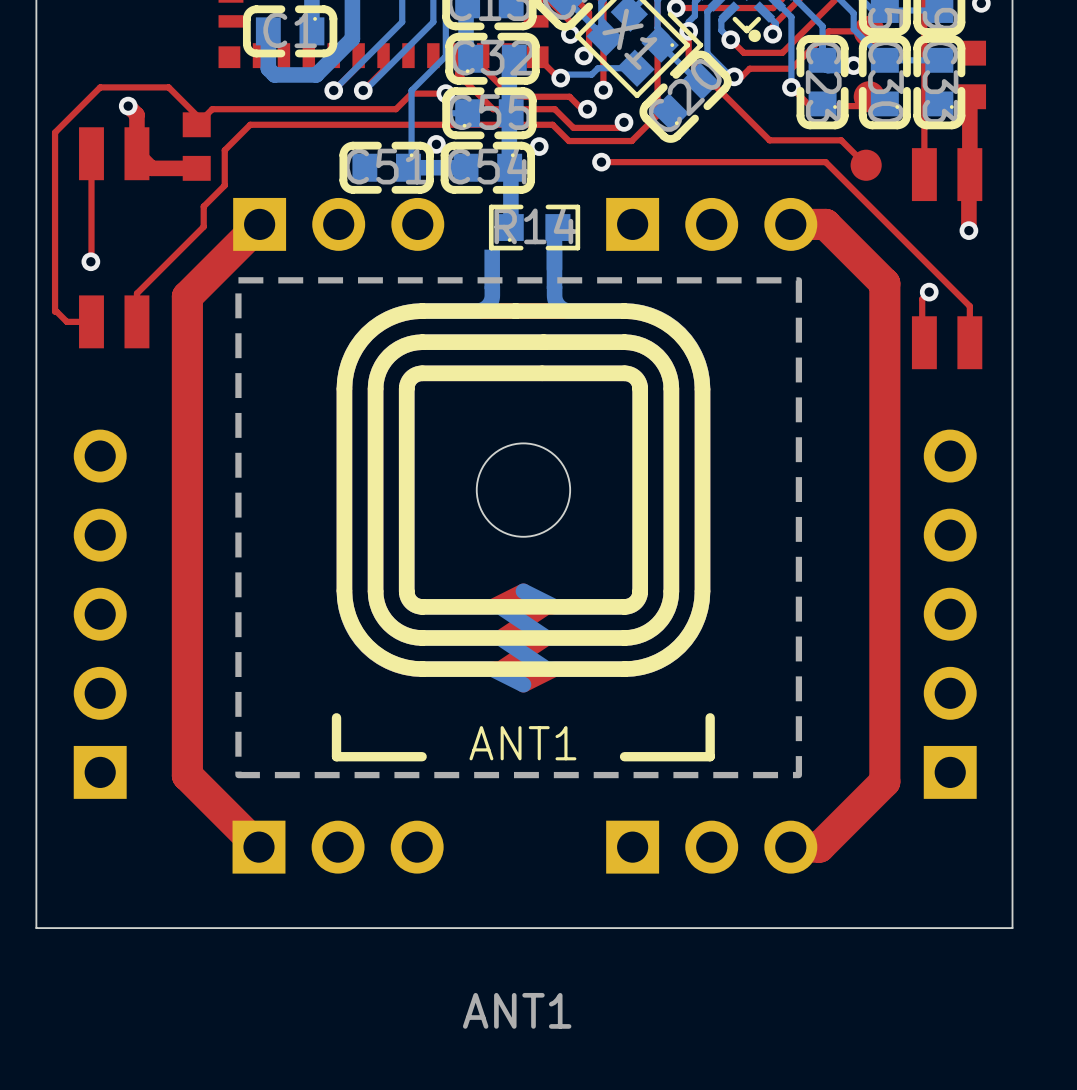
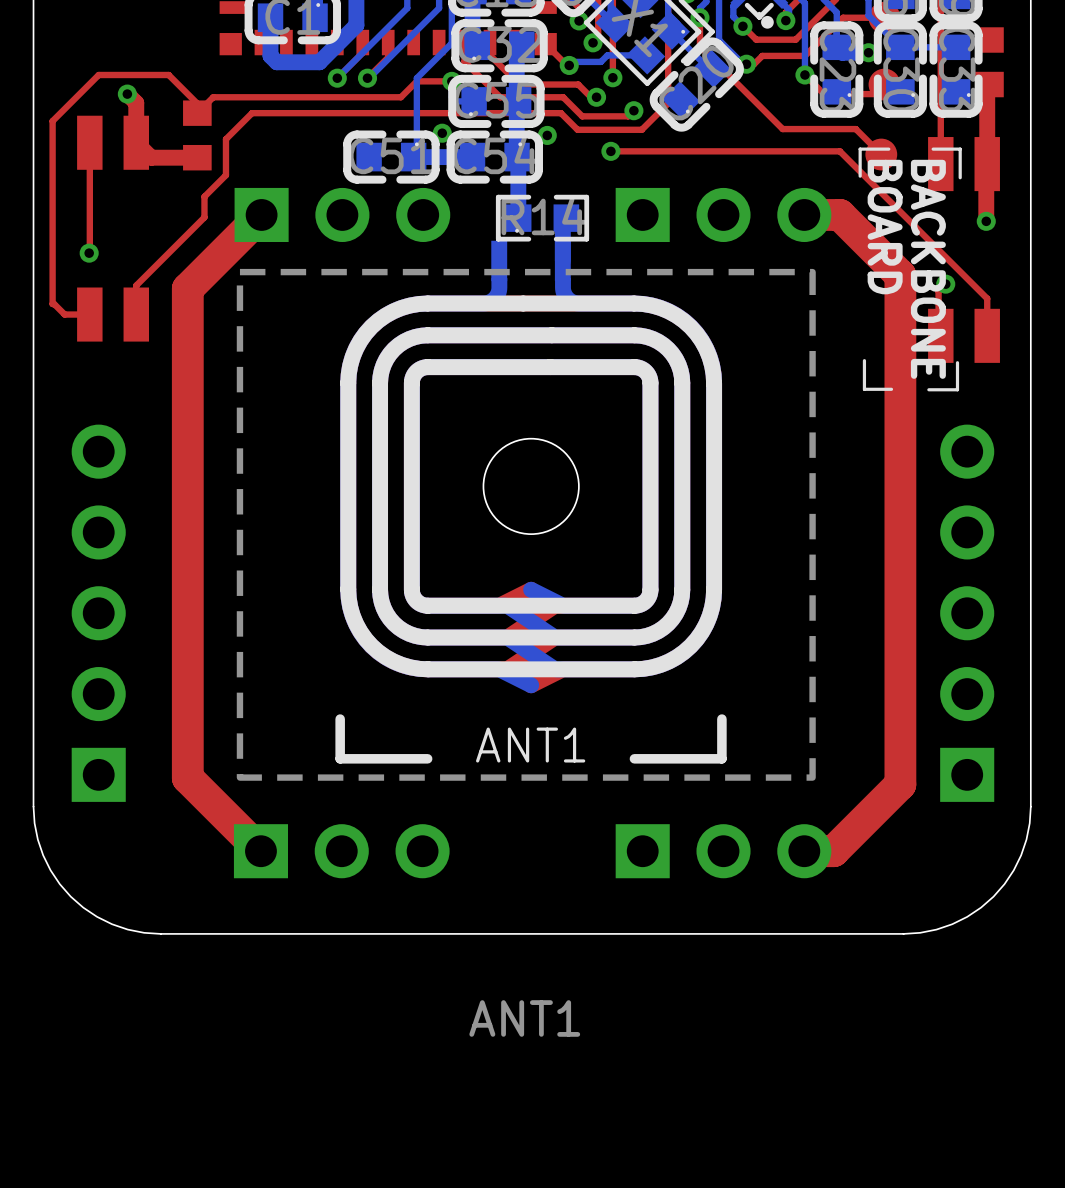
line: none -> (888, 149) (860, 149) (860, 176)
line: none -> (933, 149) (960, 149) (960, 177)
text: none -> BOARD (885, 227)
text: none -> BACKBONE (928, 269)
line: none -> (864, 360) (864, 389) (891, 389)
line: none -> (957, 362) (957, 389) (928, 389)
board edge: (36, 803) (36, 928) (160, 928) -> (33, 806) (37, 839) (43, 855) (59, 884) (70, 896) (83, 907) (112, 924) (144, 932) (160, 933)
board edge: (1012, 803) (1012, 928) (887, 928) -> (1030, 806) (1029, 823) (1021, 855) (1013, 870) (993, 896) (967, 916) (952, 924) (936, 929) (903, 933)

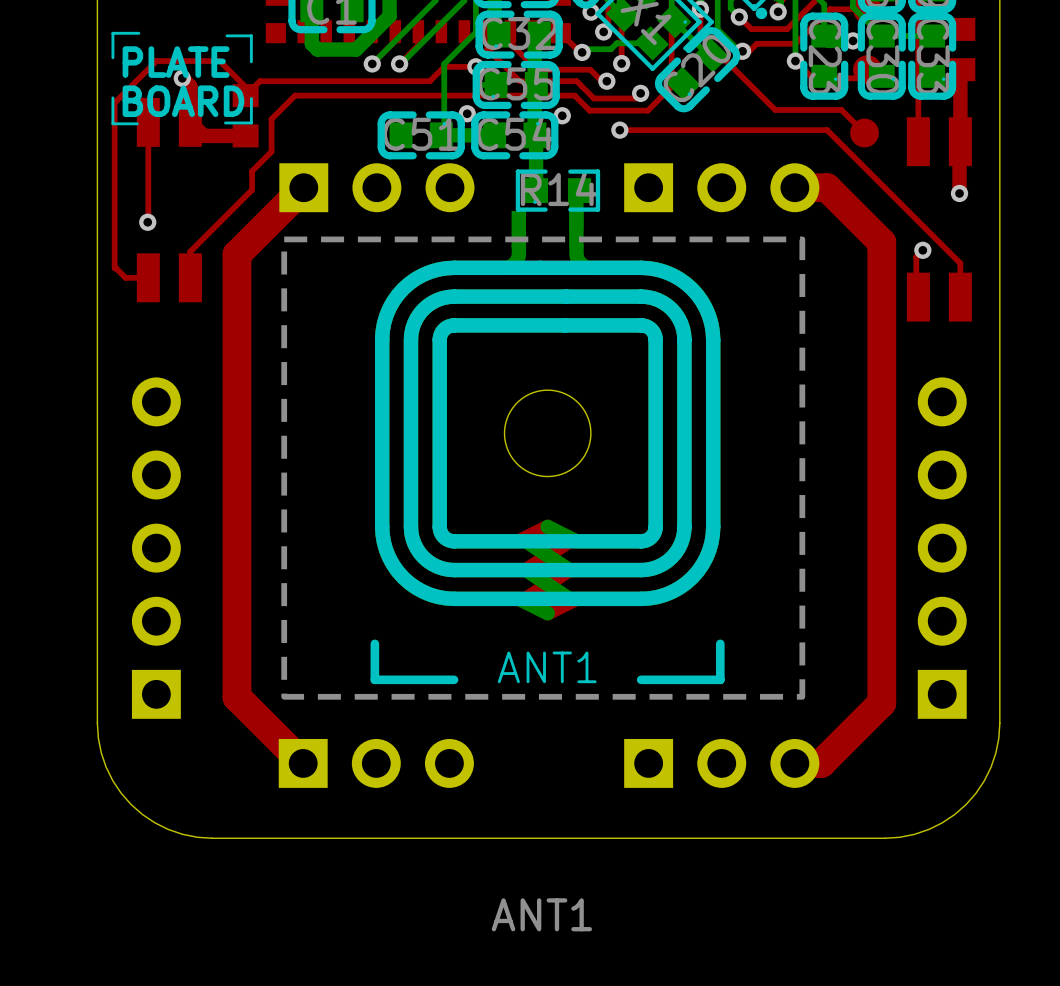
line: none -> (138, 33) (112, 33) (112, 57)
text: none -> PLATE (176, 62)
line: none -> (112, 97) (112, 123) (137, 123)
text: none -> BOARD (183, 101)
line: (888, 149) (860, 149) (860, 176) -> none
line: (933, 149) (960, 149) (960, 177) -> (226, 35) (251, 35) (251, 61)
text: BOARD (885, 227) -> none
text: BACKBONE (928, 269) -> none
line: (864, 360) (864, 389) (891, 389) -> none
line: (957, 362) (957, 389) (928, 389) -> (251, 98) (251, 122) (225, 122)

